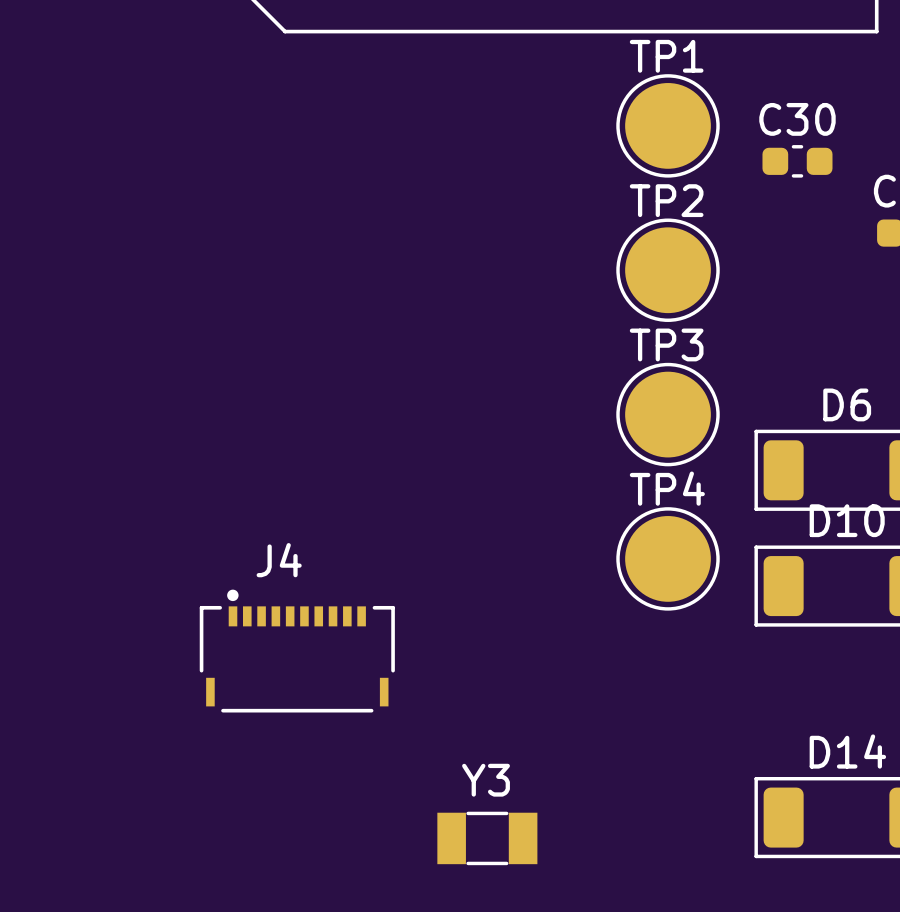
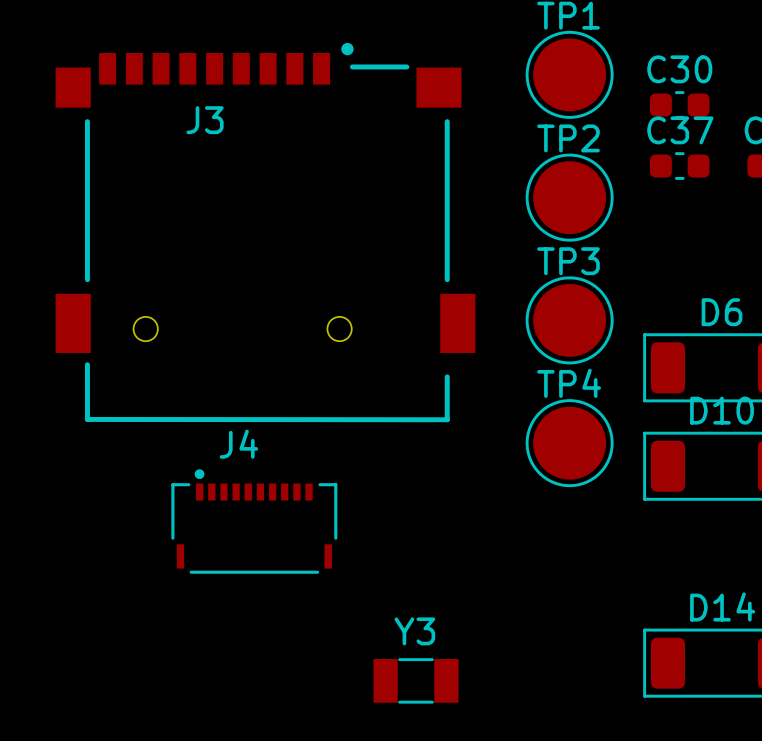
C37: none -> (679, 166)
J3: none -> (265, 232)

